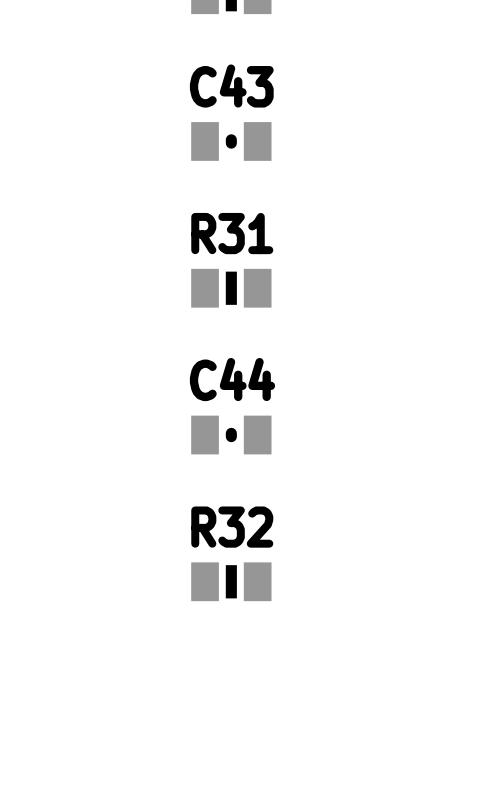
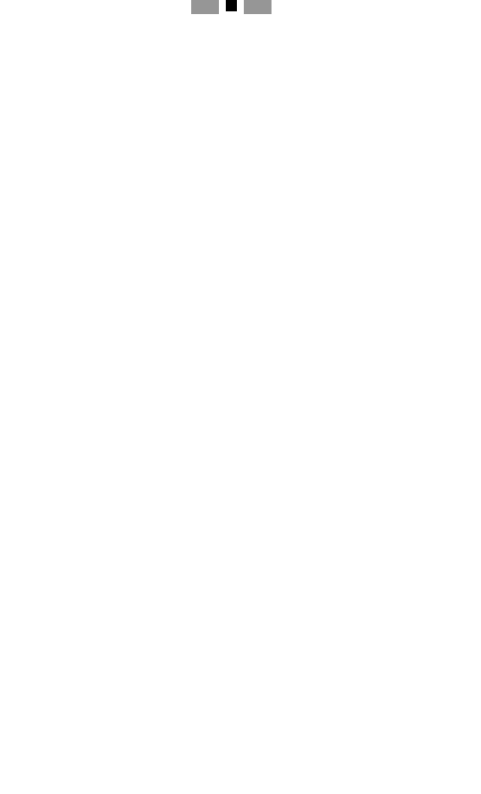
C43: (231, 141) -> none
R31: (231, 288) -> none
C44: (231, 435) -> none
R32: (231, 581) -> none

